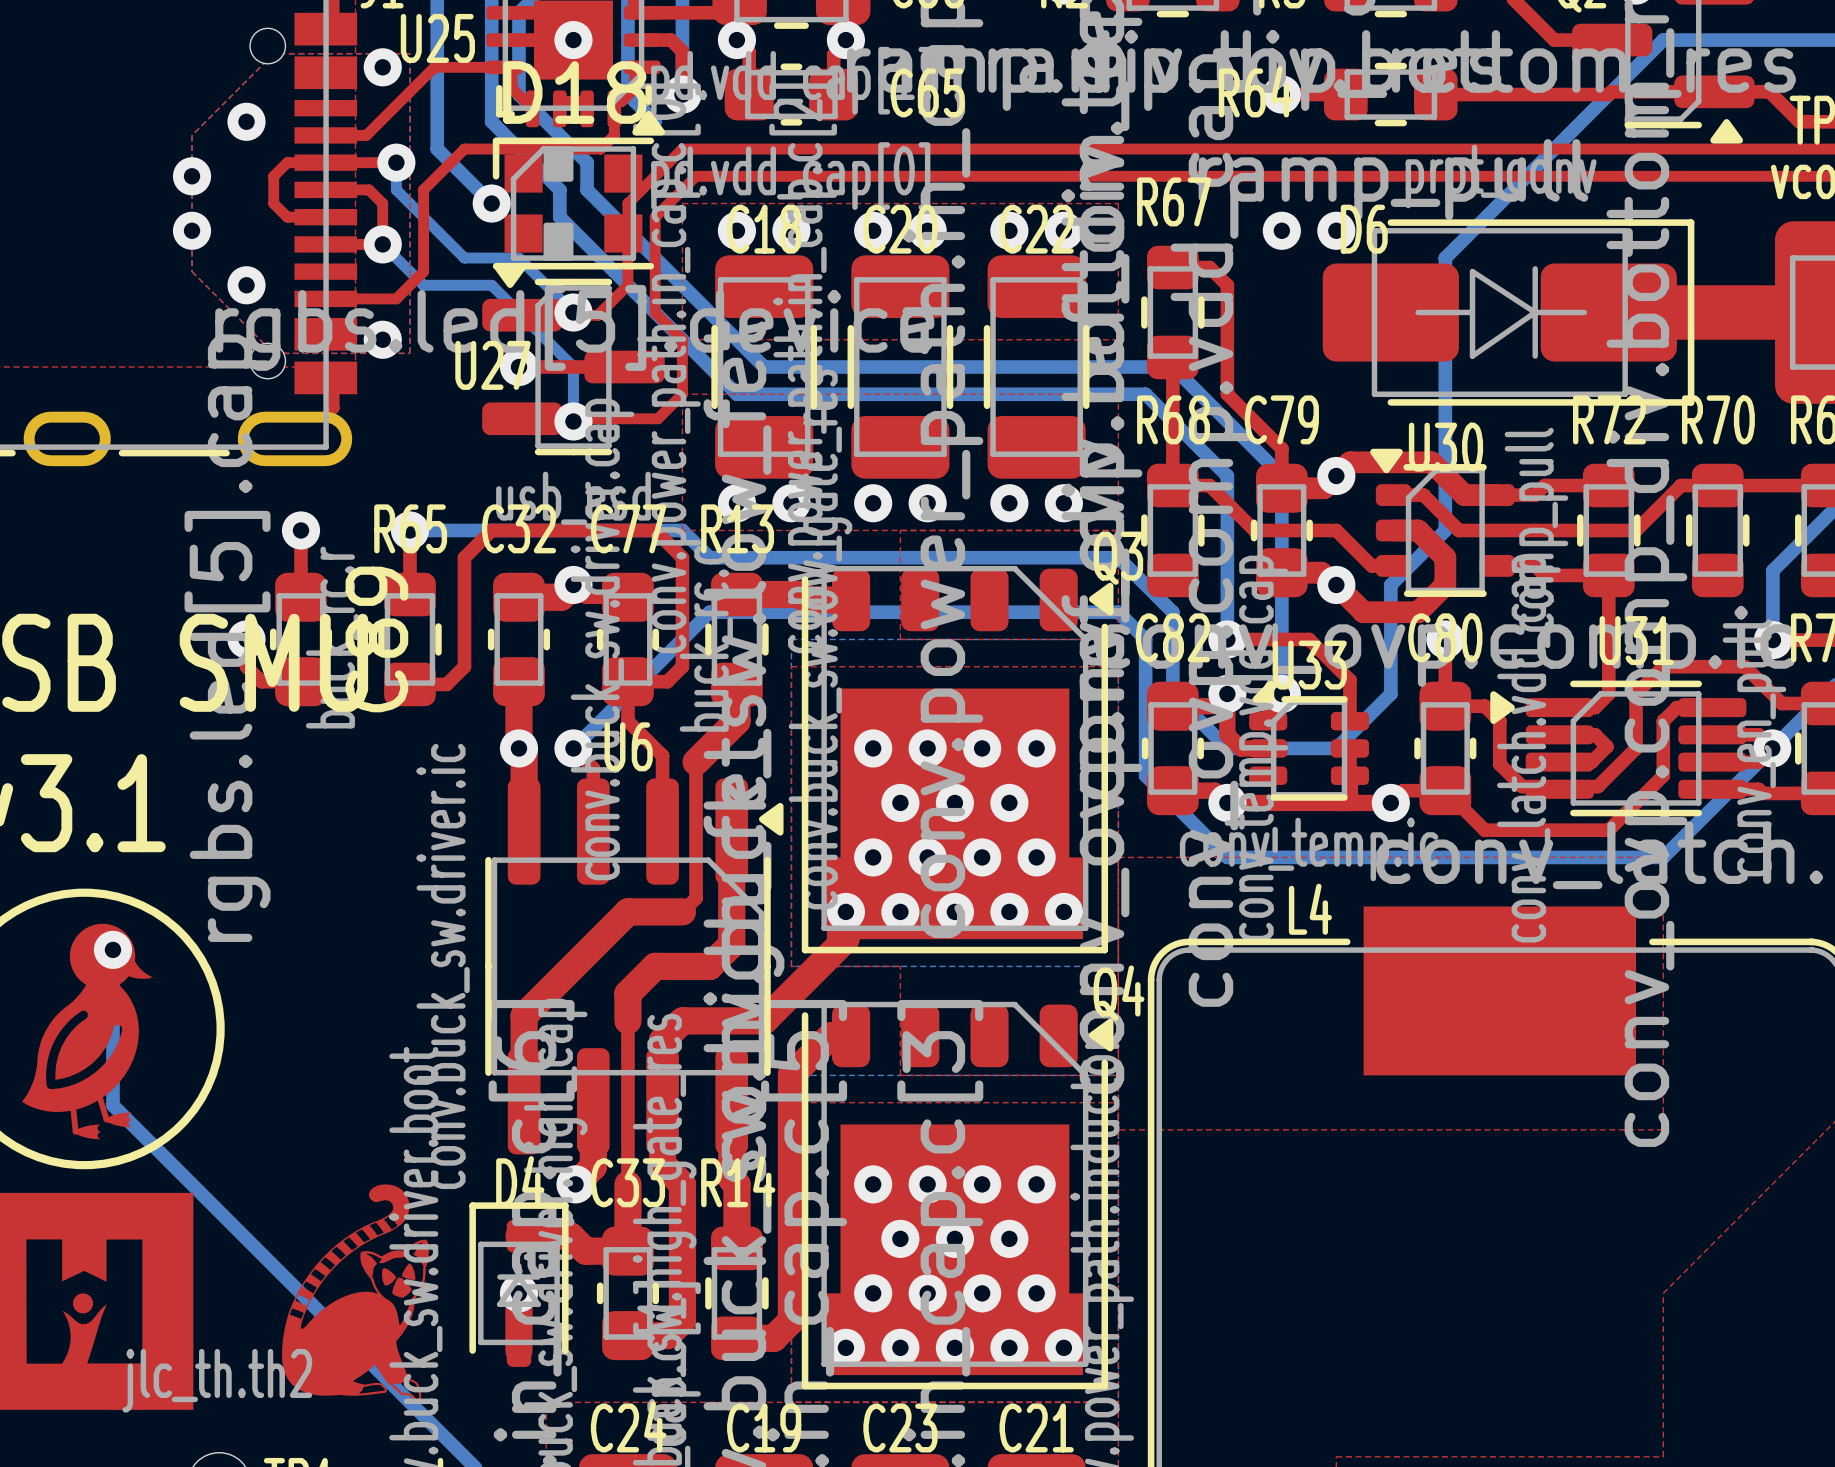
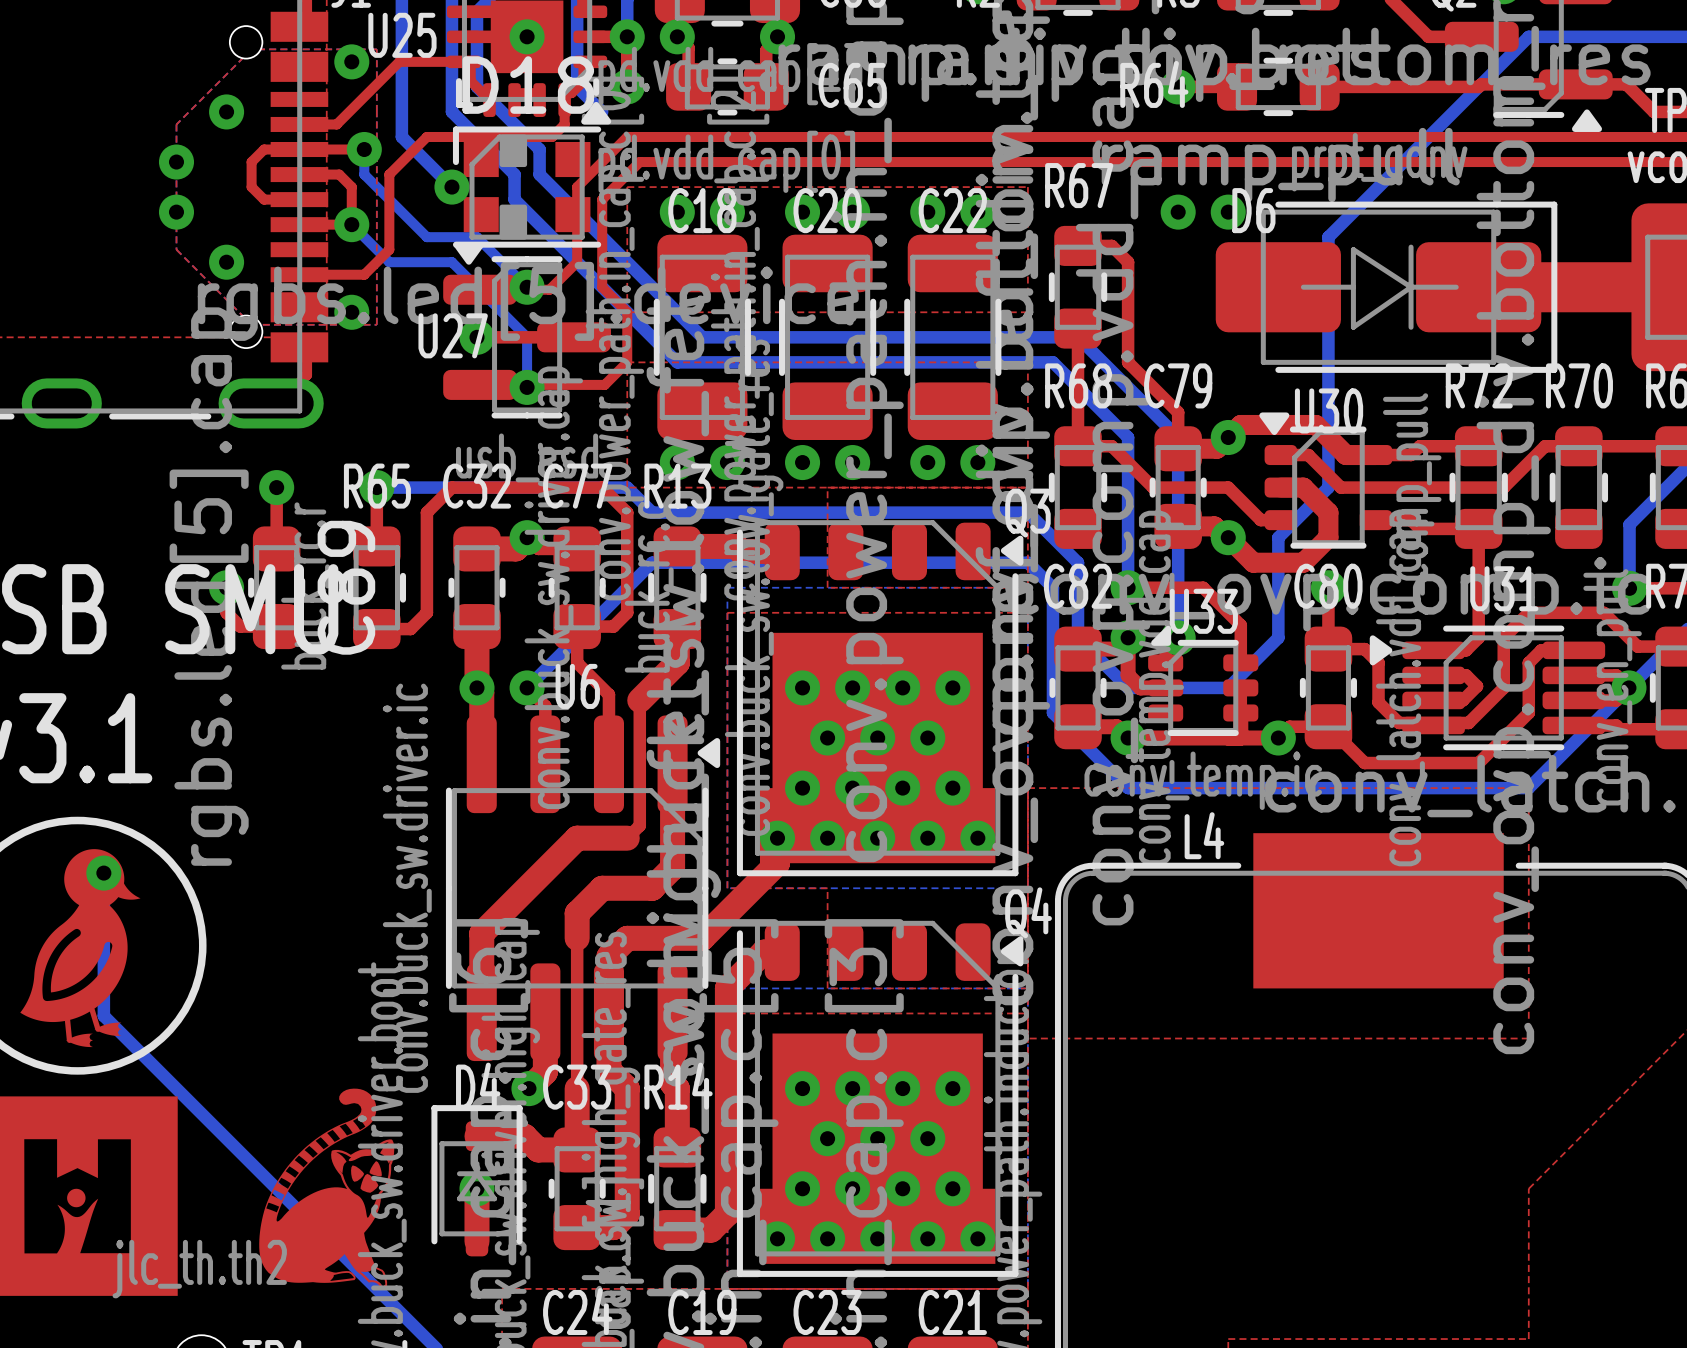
top track: (739, 10) (736, 12) (642, 12) -> none
via: none -> (627, 36)

